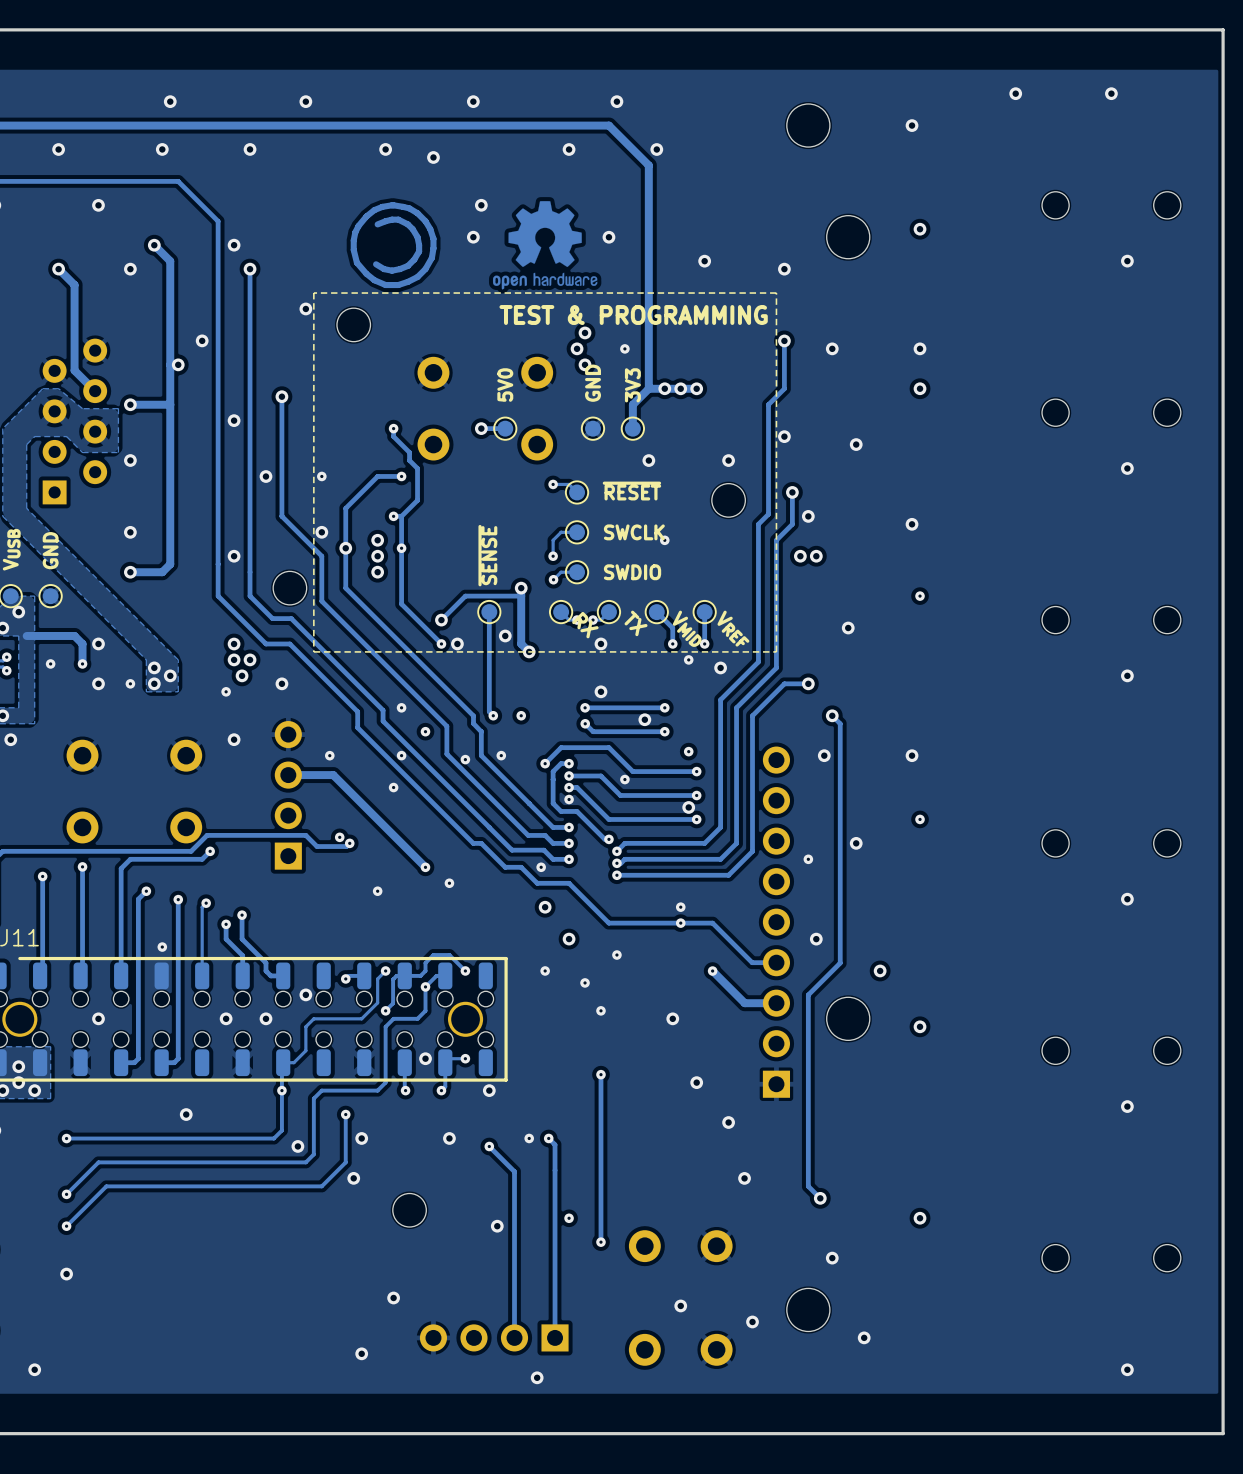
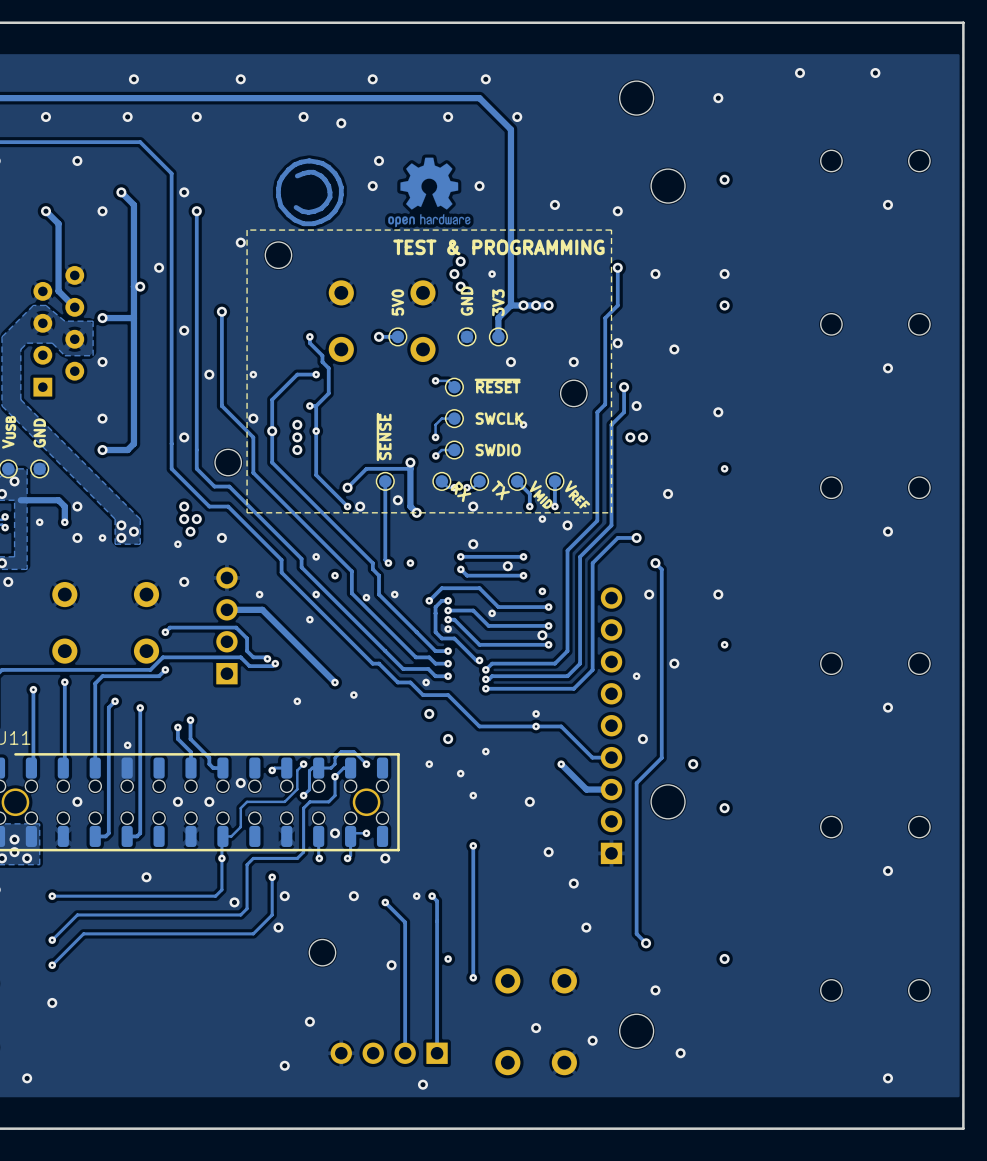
track: none -> (165, 632) (169, 627) (236, 627) (247, 638) (247, 651) (253, 657) (267, 658)
via: none -> (165, 632)
track: (206, 903) (202, 907) (202, 975) -> none
via: (206, 903) -> none

